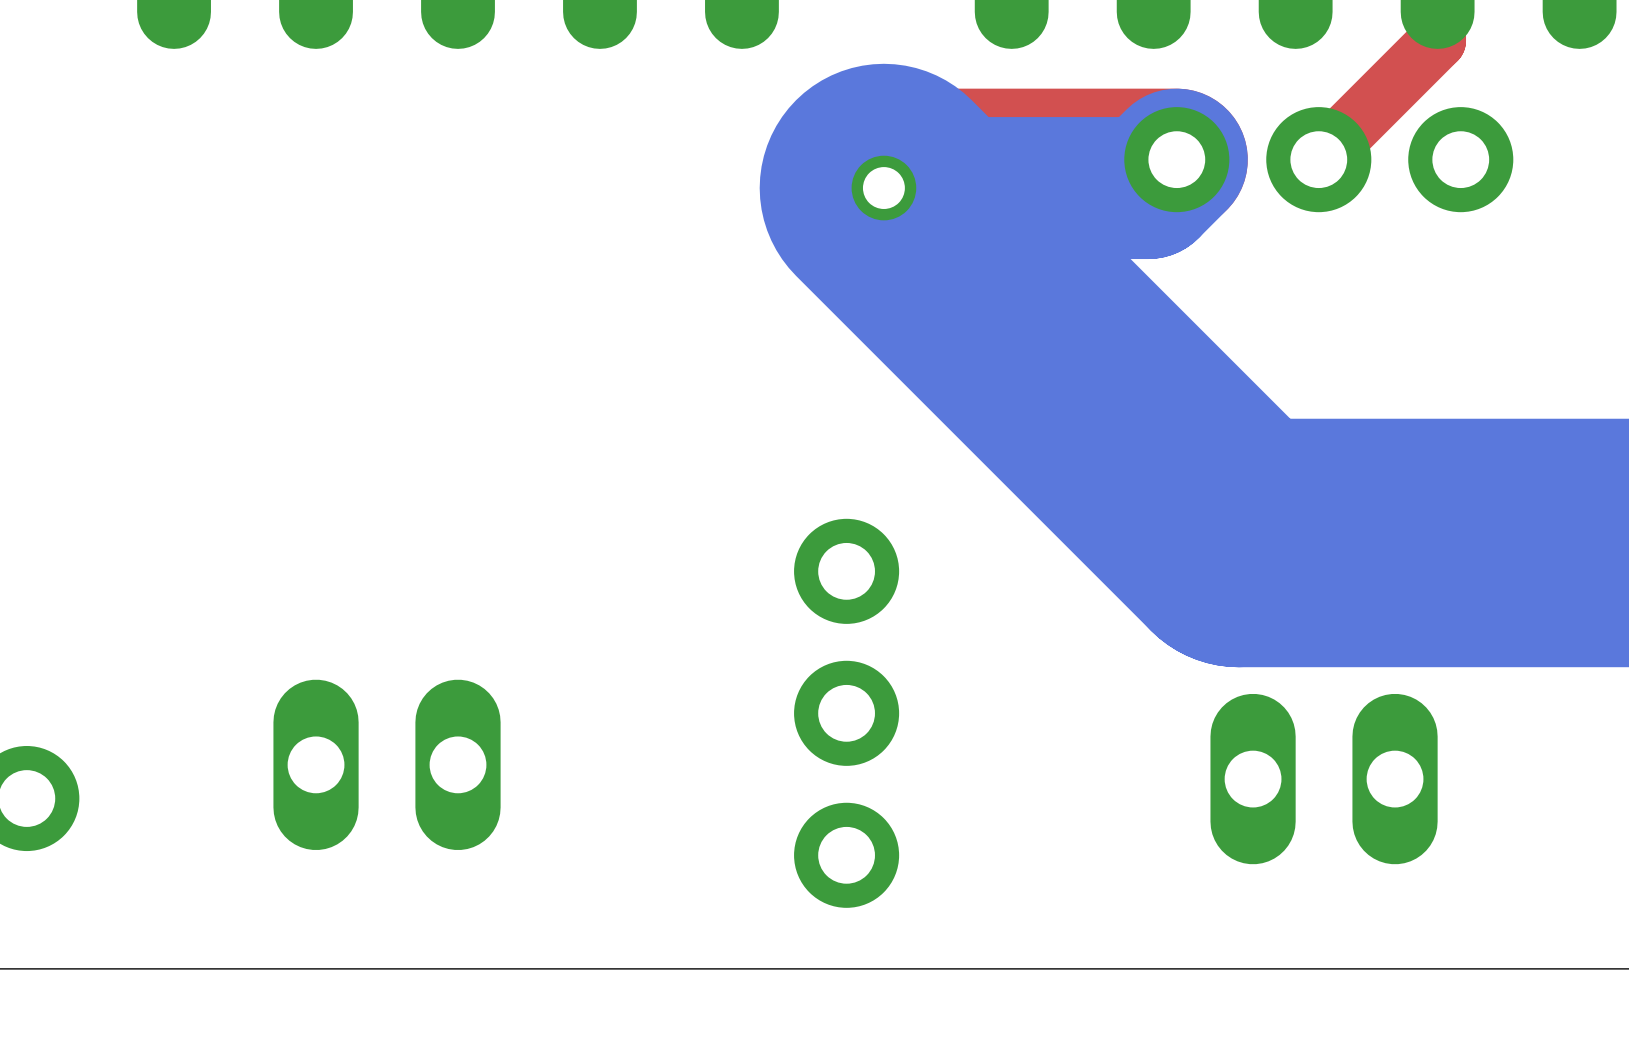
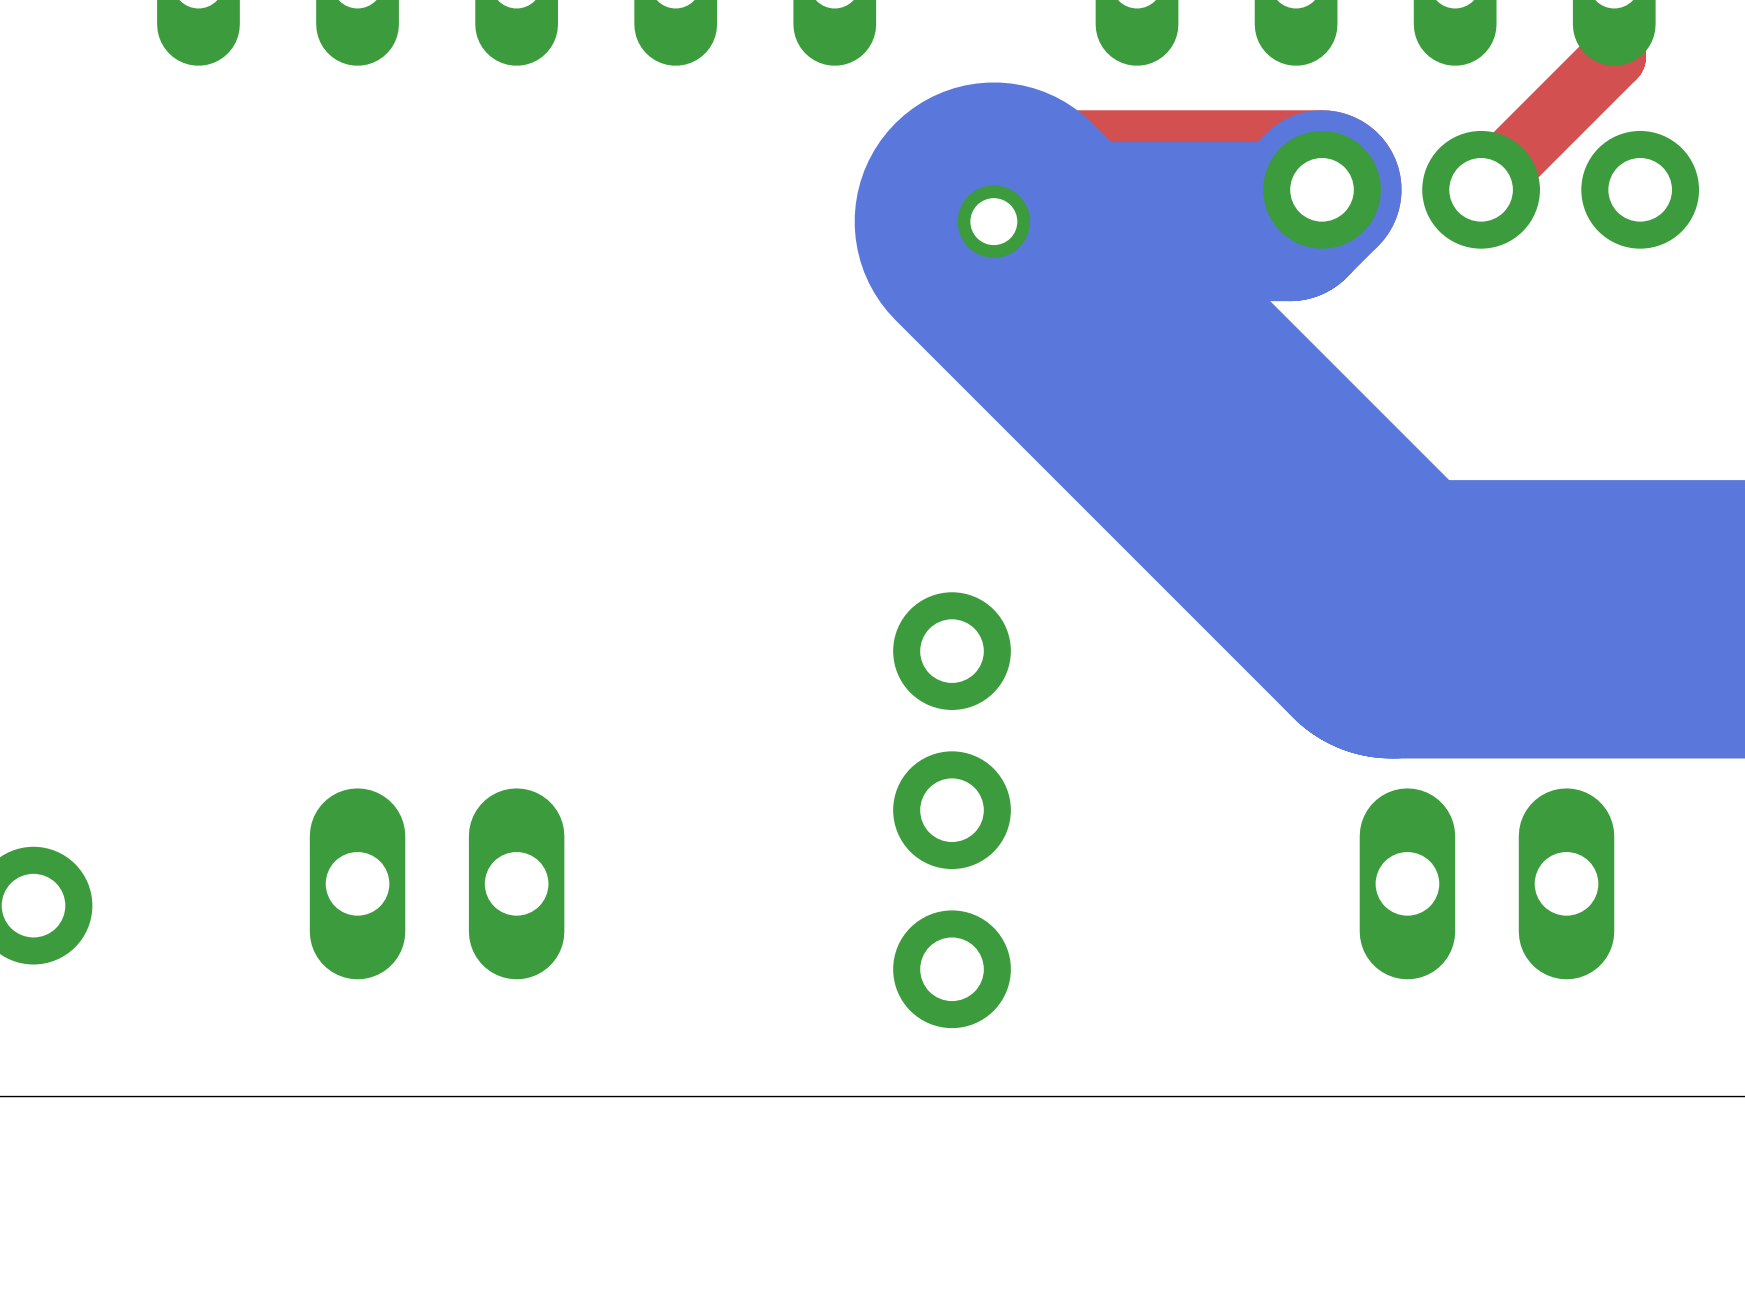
part position: (387, 764) -> (437, 883)

